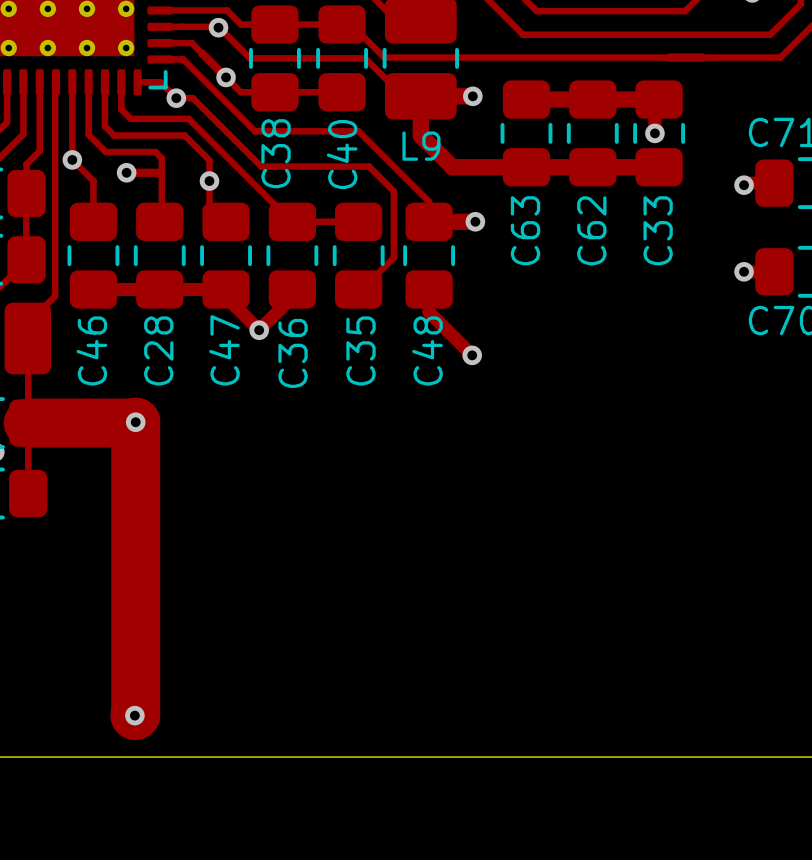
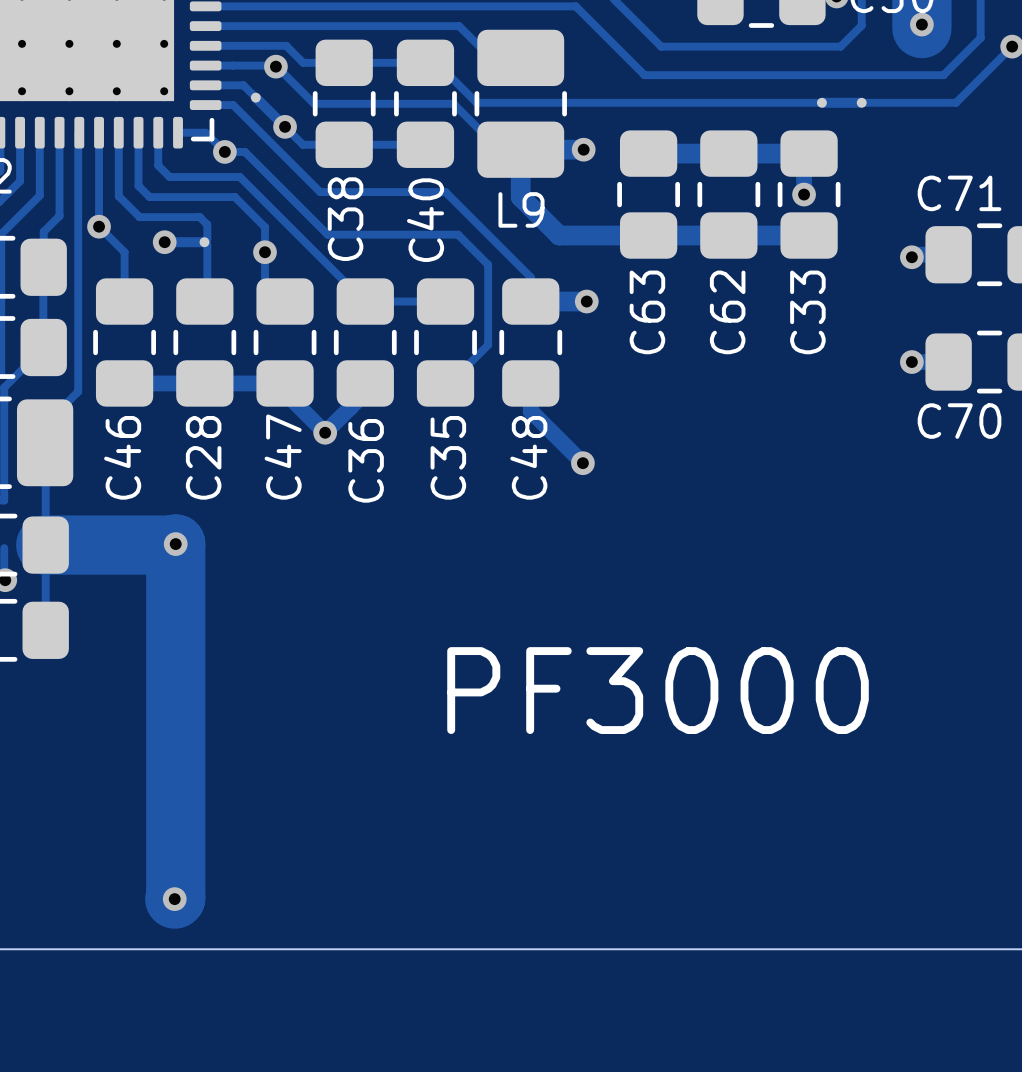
text: none -> PF3000 (658, 690)

